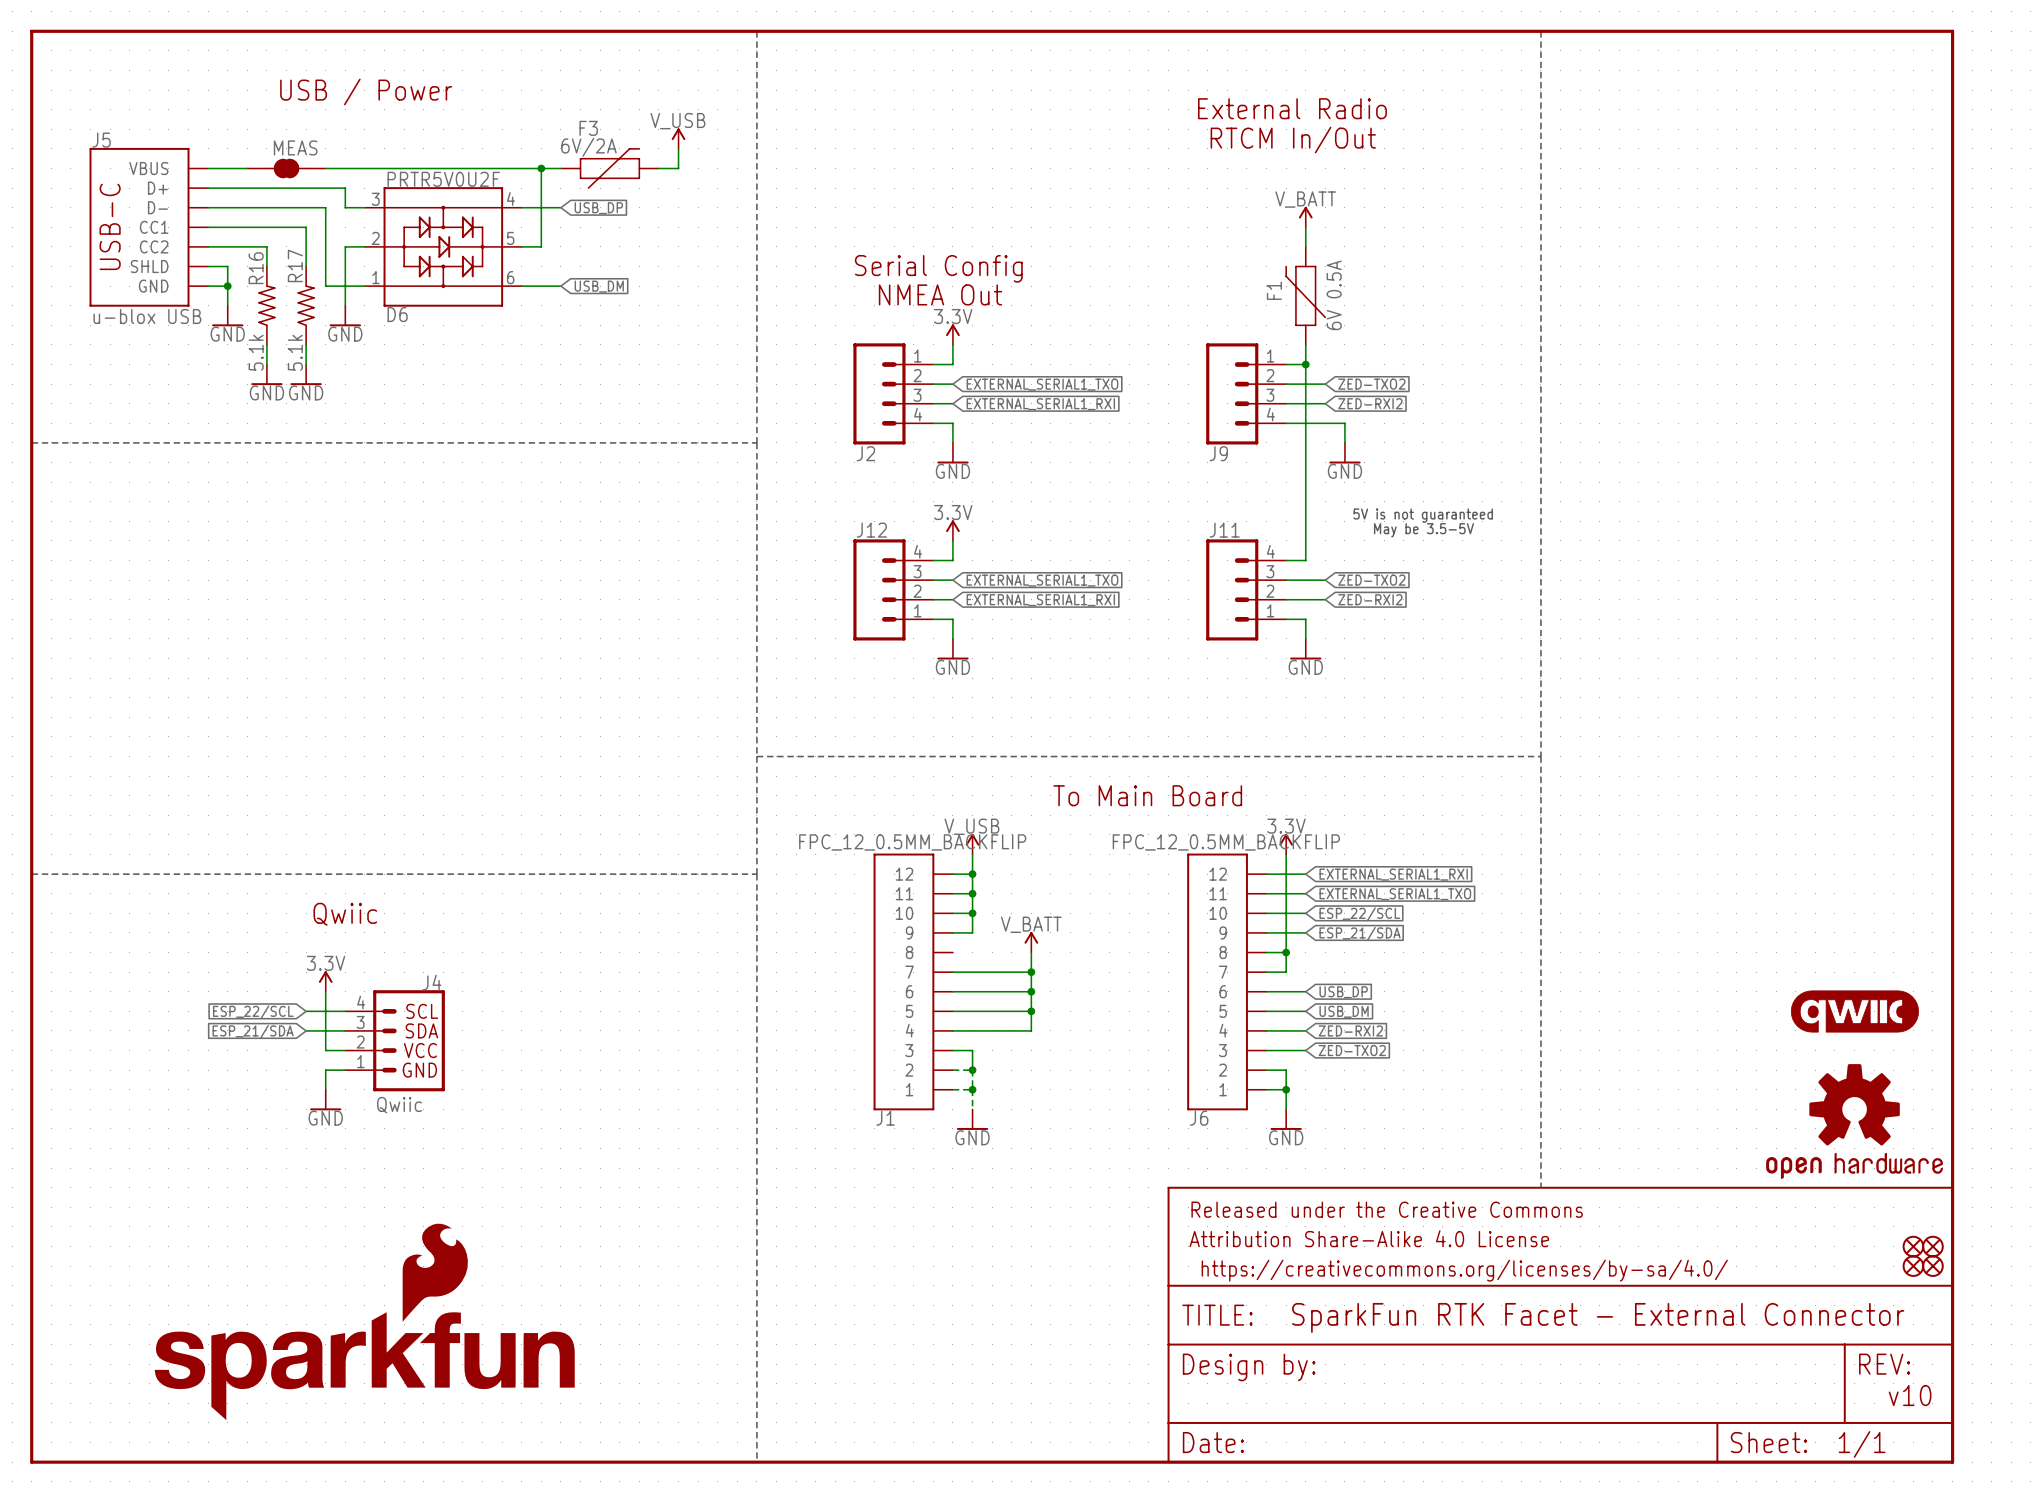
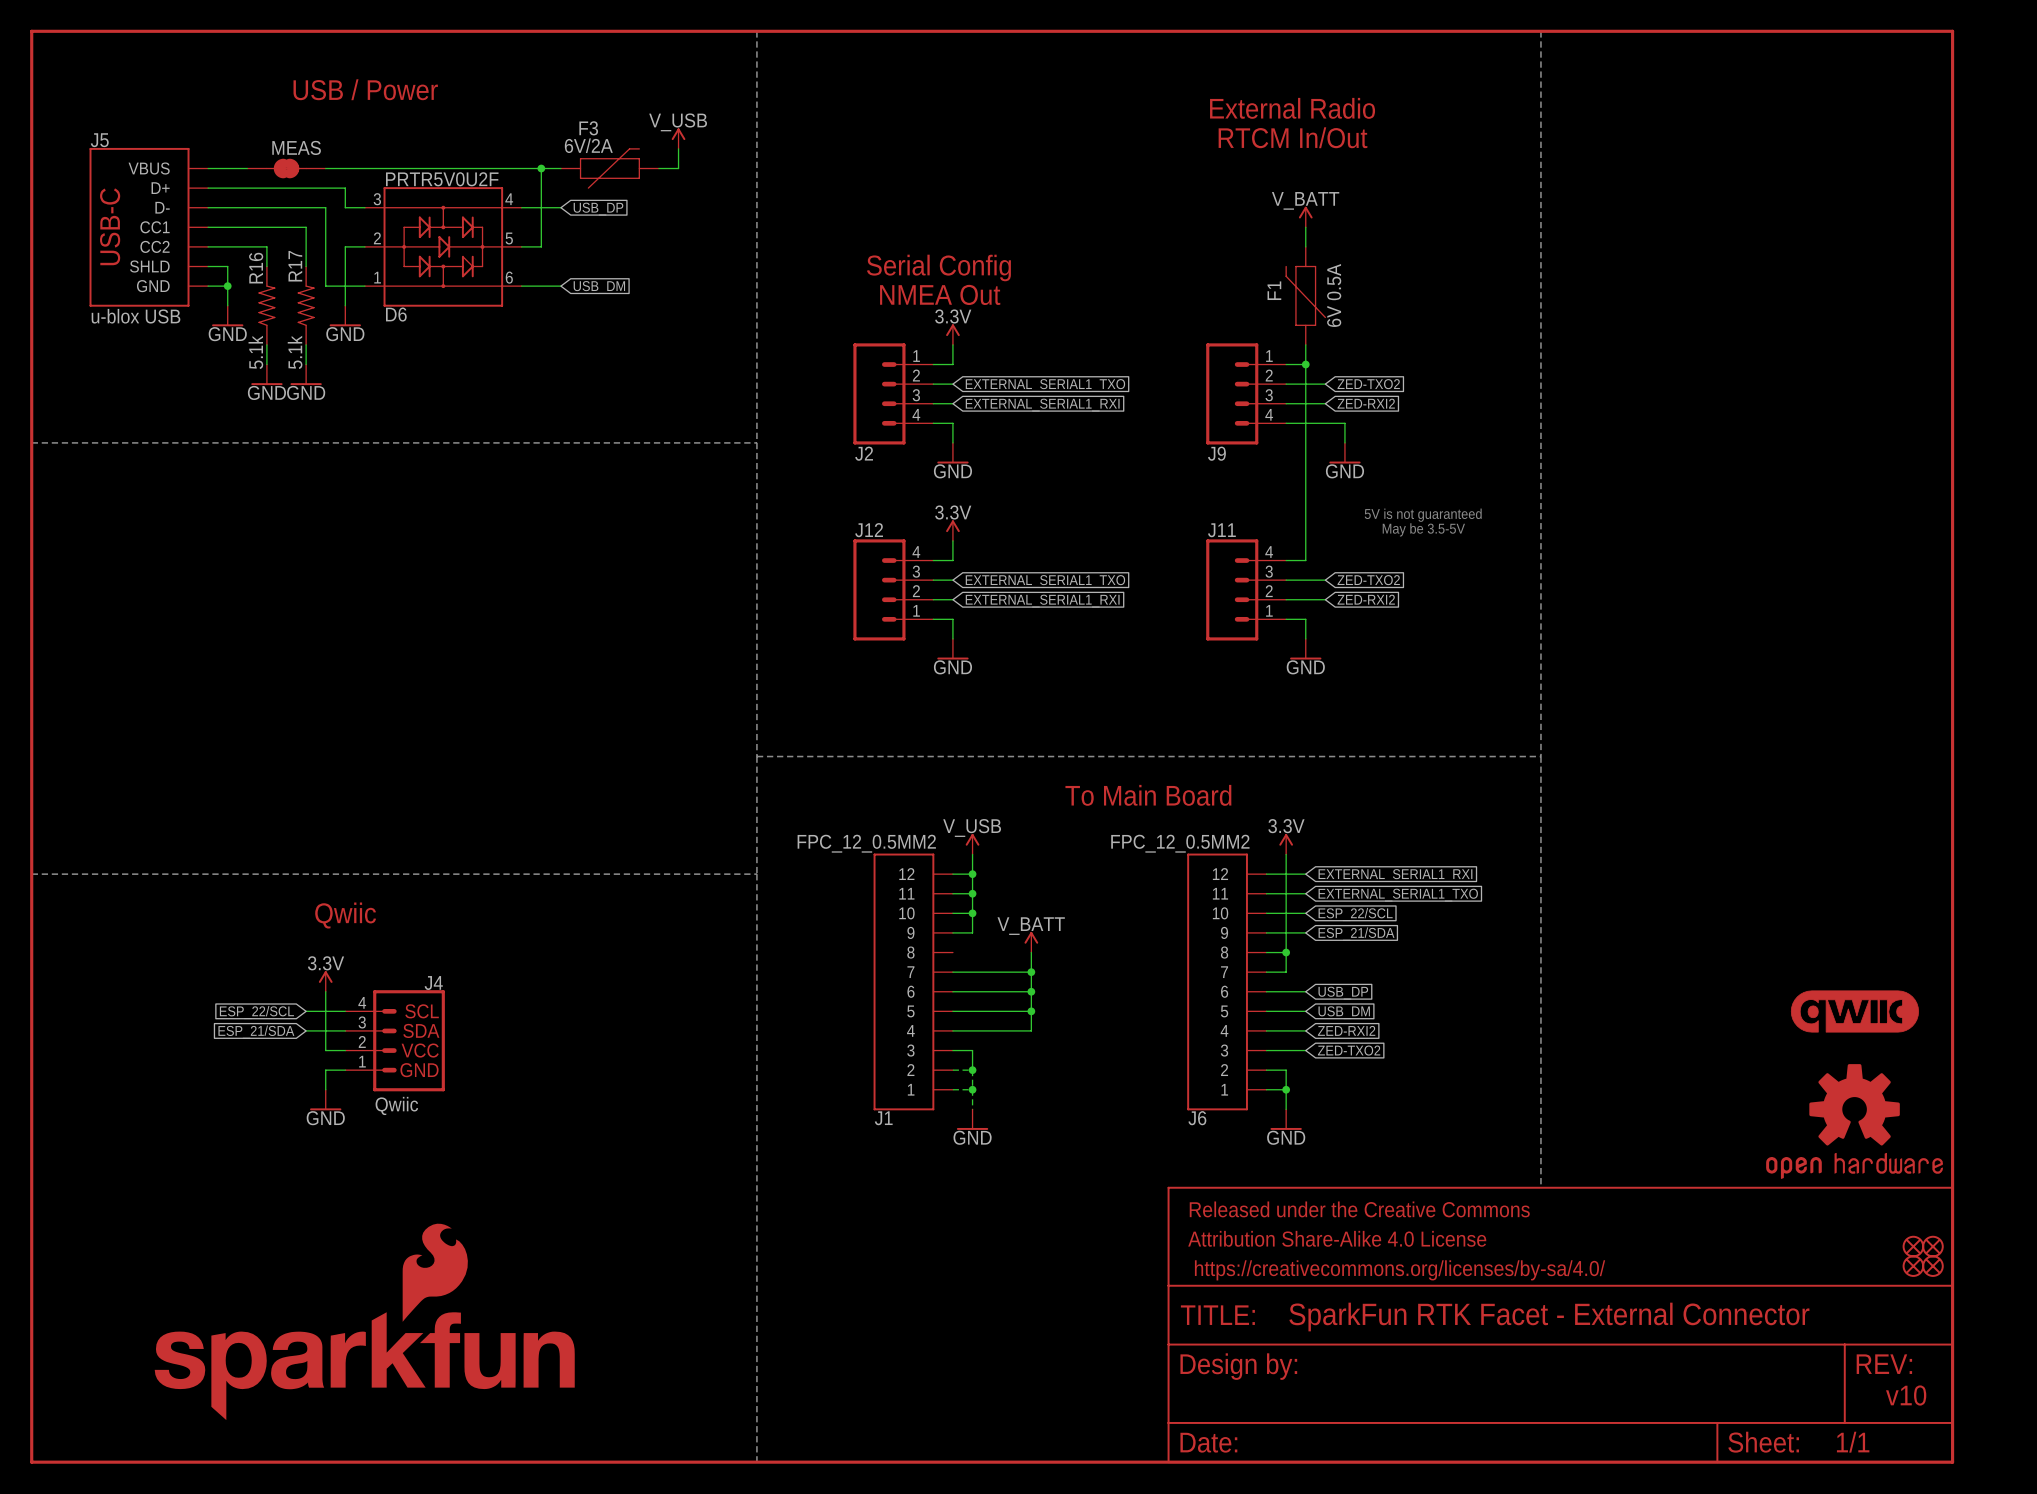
J1 value: FPC_12_0.5MM_BACKFLIP (912, 842) -> FPC_12_0.5MM2 (866, 843)
J6 value: FPC_12_0.5MM_BACKFLIP (1226, 842) -> FPC_12_0.5MM2 (1180, 843)

